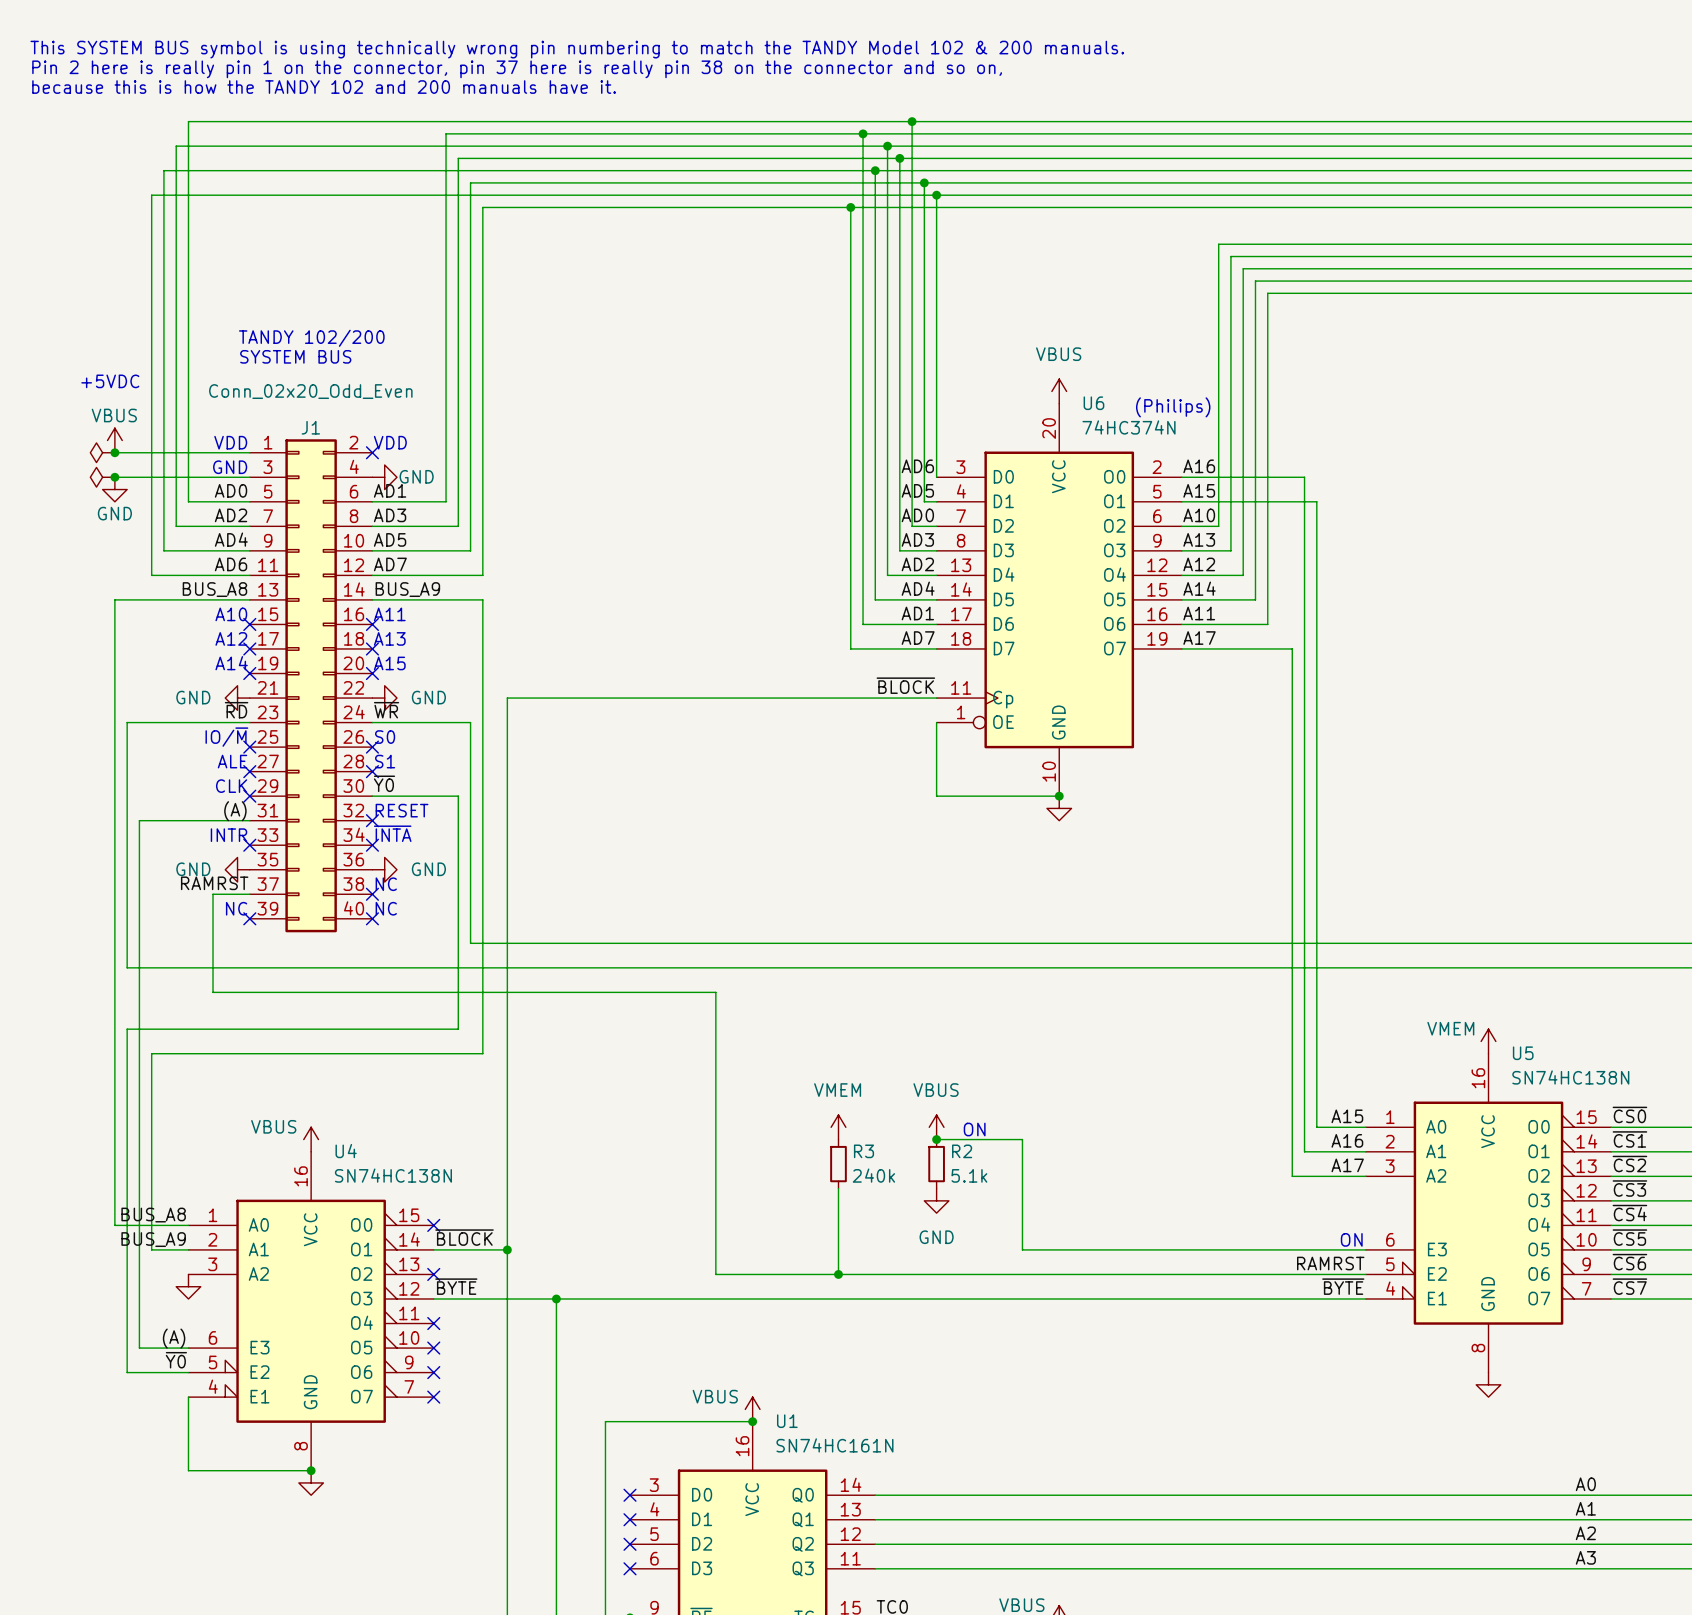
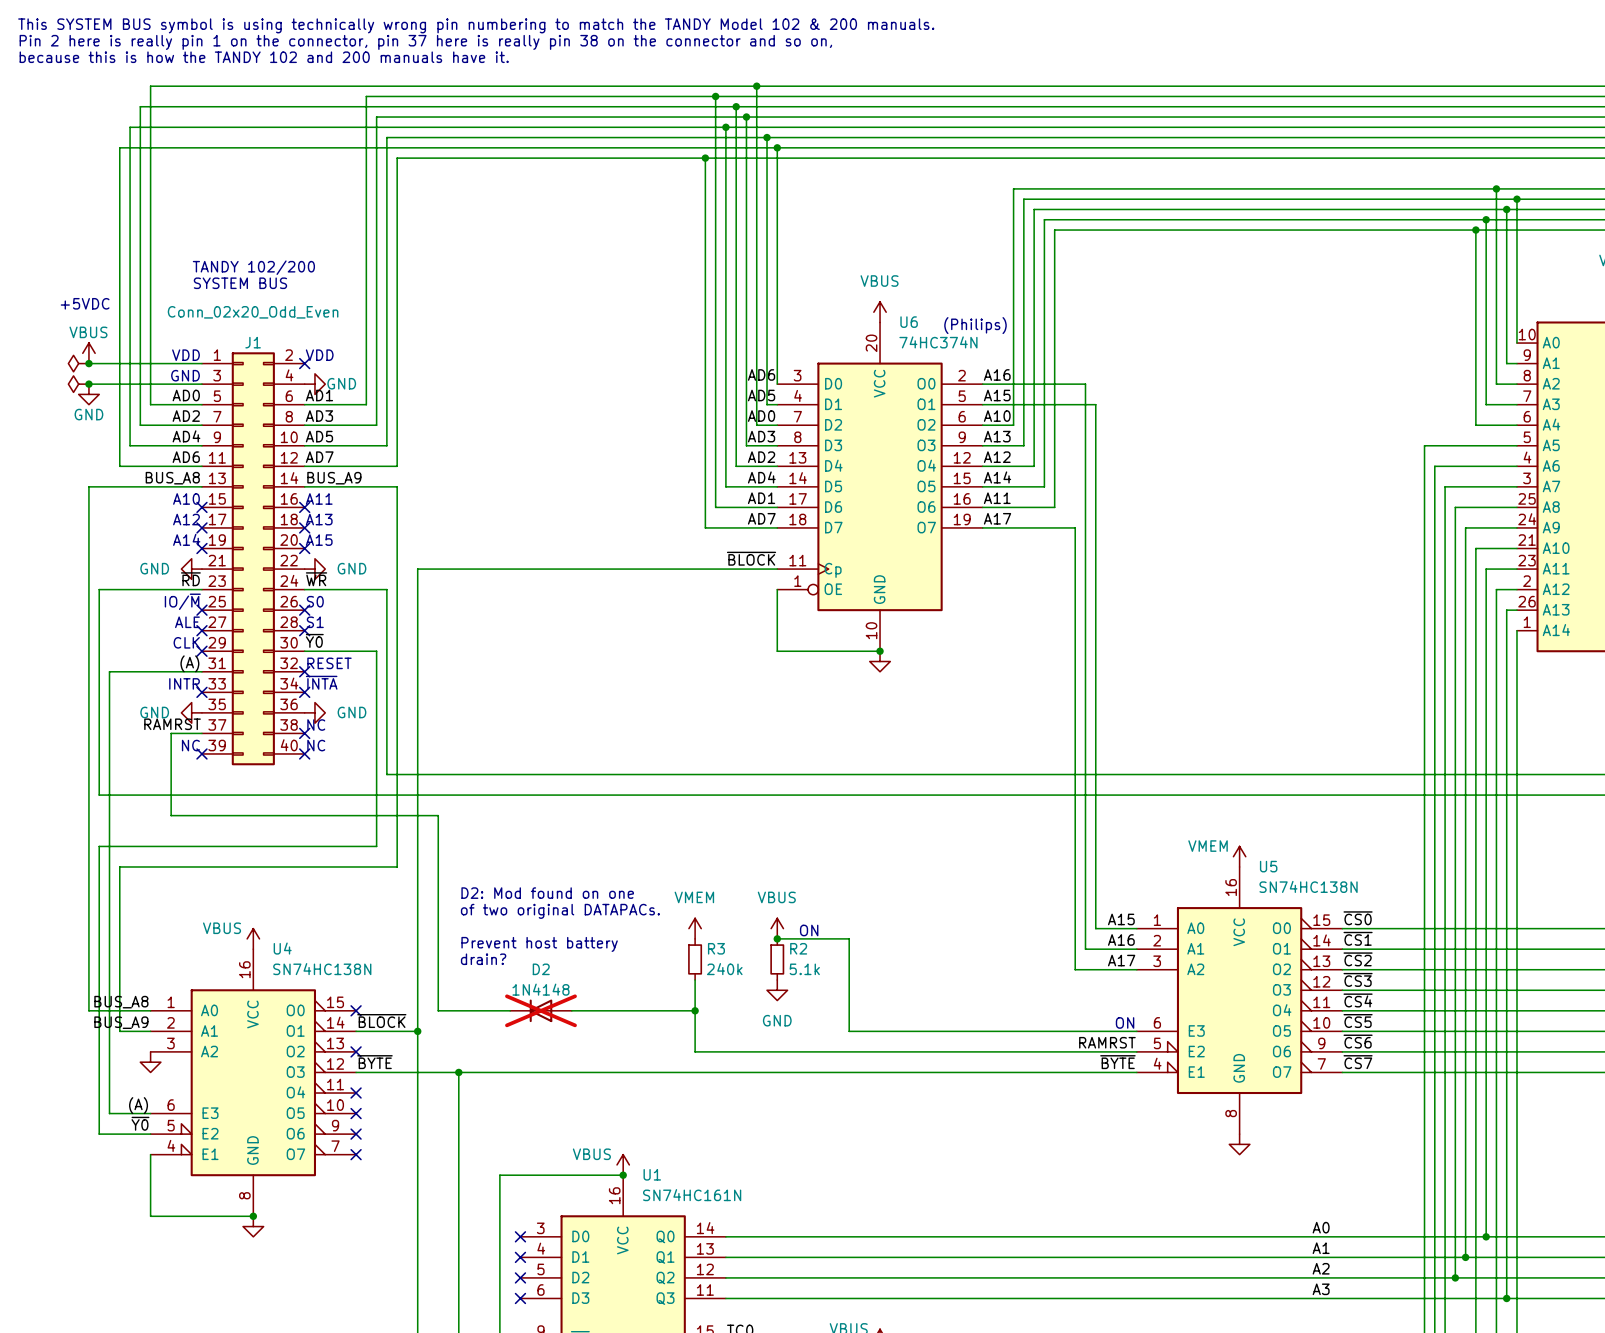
wire: (531, 992) (715, 992) (715, 1274) (838, 1274) -> (438, 815) (438, 1010) (510, 1010)
text: none -> D2: Mod found on one (547, 893)
text: none -> of two original DATAPACs. (560, 911)
text: none -> Prevent host battery (539, 944)
text: none -> drain? (483, 959)
D2: none -> 1N4148 (540, 1010)
wire: none -> (571, 1010) (695, 1010)
junction position: (838, 1274) -> (695, 1010)

